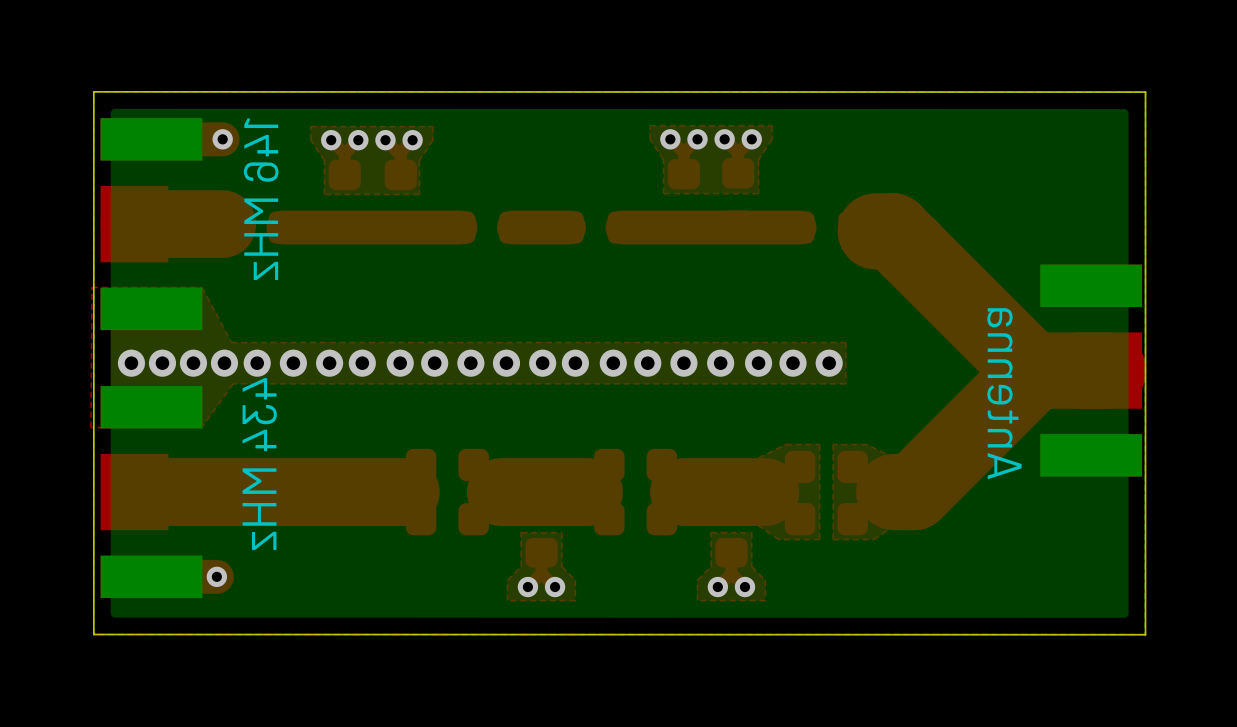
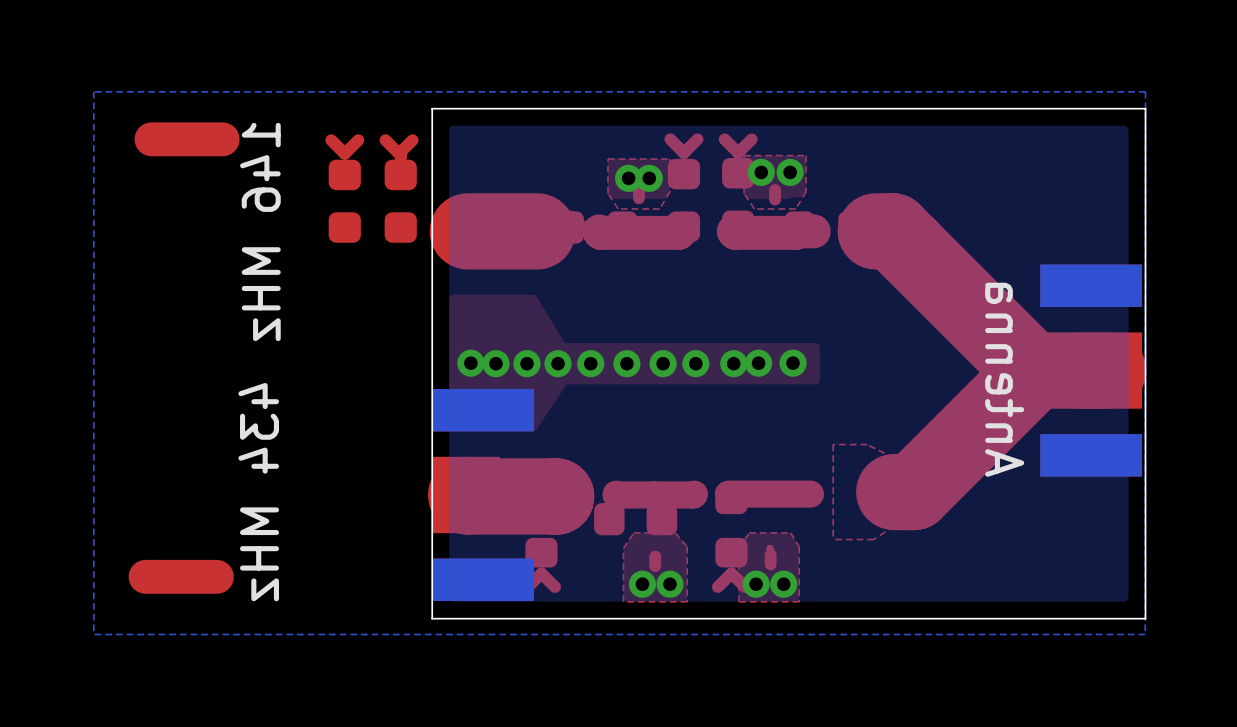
board edge: (1145, 108) (1145, 92) (93, 91) (93, 634) (1145, 634) (1145, 618) -> (1145, 108) (432, 108) (432, 618) (1145, 618)
top zone outline: (772, 125) (650, 125) (650, 139) (663, 159) (663, 193) (758, 193) (758, 159) (772, 139) (772, 125) -> none
top zone outline: (432, 126) (310, 126) (310, 140) (324, 160) (324, 194) (419, 194) (419, 160) (432, 140) (432, 126) -> none
via: (222, 139) -> none
via: (670, 139) -> none
via: (697, 139) -> none
via: (724, 139) -> none
via: (751, 139) -> none
via: (331, 140) -> none
via: (358, 140) -> none
via: (385, 140) -> none
via: (412, 140) -> none
top zone outline: none -> (806, 155) (744, 155) (744, 193) (754, 208) (795, 208) (806, 191) (806, 155)
top zone outline: none -> (669, 159) (607, 159) (607, 193) (618, 208) (659, 208) (669, 191) (669, 159)
via: none -> (761, 172)
via: none -> (790, 172)
via: none -> (628, 178)
via: none -> (649, 178)
top track: none -> (638, 188) (638, 198)
top track: none -> (775, 190) (775, 199)
part: (151, 224) -> none
top track: (222, 224) (134, 224) -> none
top track: (460, 227) (283, 227) -> none
top track: (799, 227) (622, 227) -> none
top track: none -> (537, 231) (467, 231)
top track: none -> (680, 231) (599, 231)
top track: none -> (813, 231) (733, 231)
top zone outline: (202, 287) (91, 287) (91, 427) (202, 426) (233, 383) (845, 383) (845, 342) (231, 342) (202, 287) -> none
via: (131, 363) -> none
via: (162, 363) -> none
via: (193, 363) -> none
via: (224, 363) -> none
via: (257, 363) -> none
via: (293, 363) -> none
via: (329, 363) -> none
via: (362, 363) -> none
via: (400, 363) -> none
via: (434, 363) -> none
via: none -> (495, 363)
via: (506, 363) -> none
via: none -> (526, 363)
via: (542, 363) -> none
via: none -> (558, 363)
via: (575, 363) -> none
via: none -> (590, 363)
via: (613, 363) -> none
via: none -> (626, 363)
via: (647, 363) -> none
via: none -> (663, 363)
via: (683, 363) -> none
via: none -> (695, 363)
via: (720, 363) -> none
via: none -> (733, 363)
via: (829, 363) -> none
top zone outline: (819, 444) (819, 539) (778, 539) (758, 525) (758, 458) (785, 444) (819, 444) -> none
part: (447, 464) -> none
part: (635, 464) -> none
part: (826, 466) -> none
part: (151, 492) -> none
top track: (405, 492) (137, 492) -> none
top track: (588, 492) (500, 492) -> none
top track: (765, 492) (683, 492) -> none
top track: none -> (466, 494) (556, 496)
part: none -> (483, 494)
top track: none -> (694, 494) (616, 494)
top track: none -> (810, 494) (729, 494)
part: (447, 519) -> none
part: (826, 519) -> none
top zone outline: (561, 532) (521, 532) (521, 566) (507, 580) (507, 600) (575, 600) (575, 580) (561, 566) (561, 532) -> none
top zone outline: none -> (675, 532) (687, 546) (687, 601) (623, 601) (623, 548) (633, 532) (675, 532)
top zone outline: (751, 532) (751, 566) (765, 580) (765, 600) (697, 600) (697, 580) (711, 566) (711, 532) (749, 532) -> (751, 532) (790, 532) (799, 546) (799, 601) (738, 601) (738, 548) (749, 532)
top track: none -> (769, 548) (770, 549)
top track: none -> (770, 554) (770, 564)
top track: none -> (655, 556) (655, 566)
via: (216, 576) -> none
via size: [734, 576, 756, 598] -> [742, 570, 770, 598]
via: none -> (642, 584)
via: none -> (669, 584)
via: none -> (783, 584)
via: (527, 587) -> none
via: (555, 587) -> none
via: (717, 587) -> none

